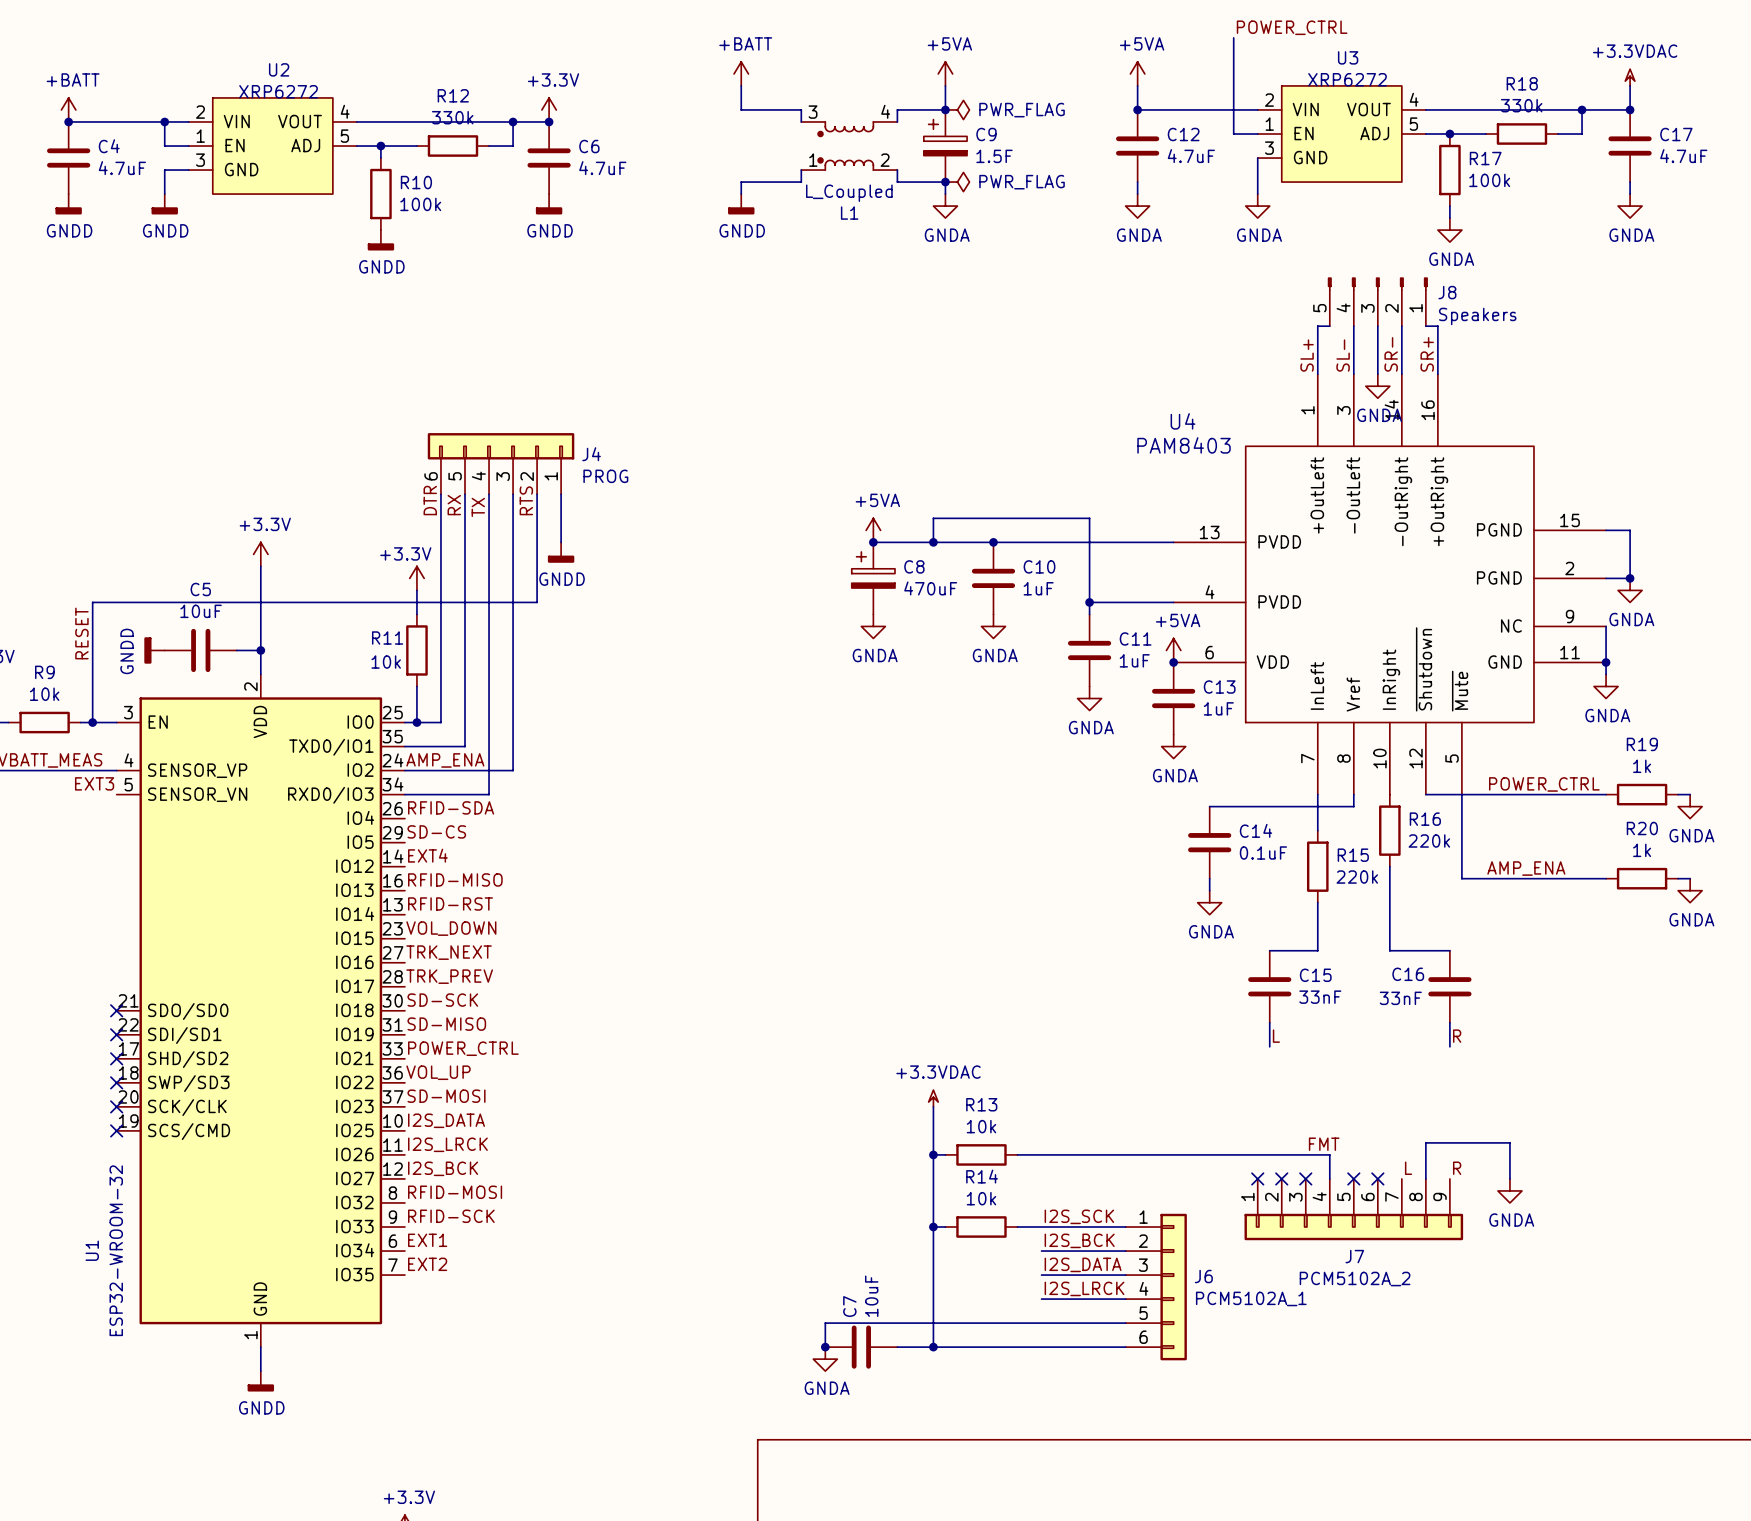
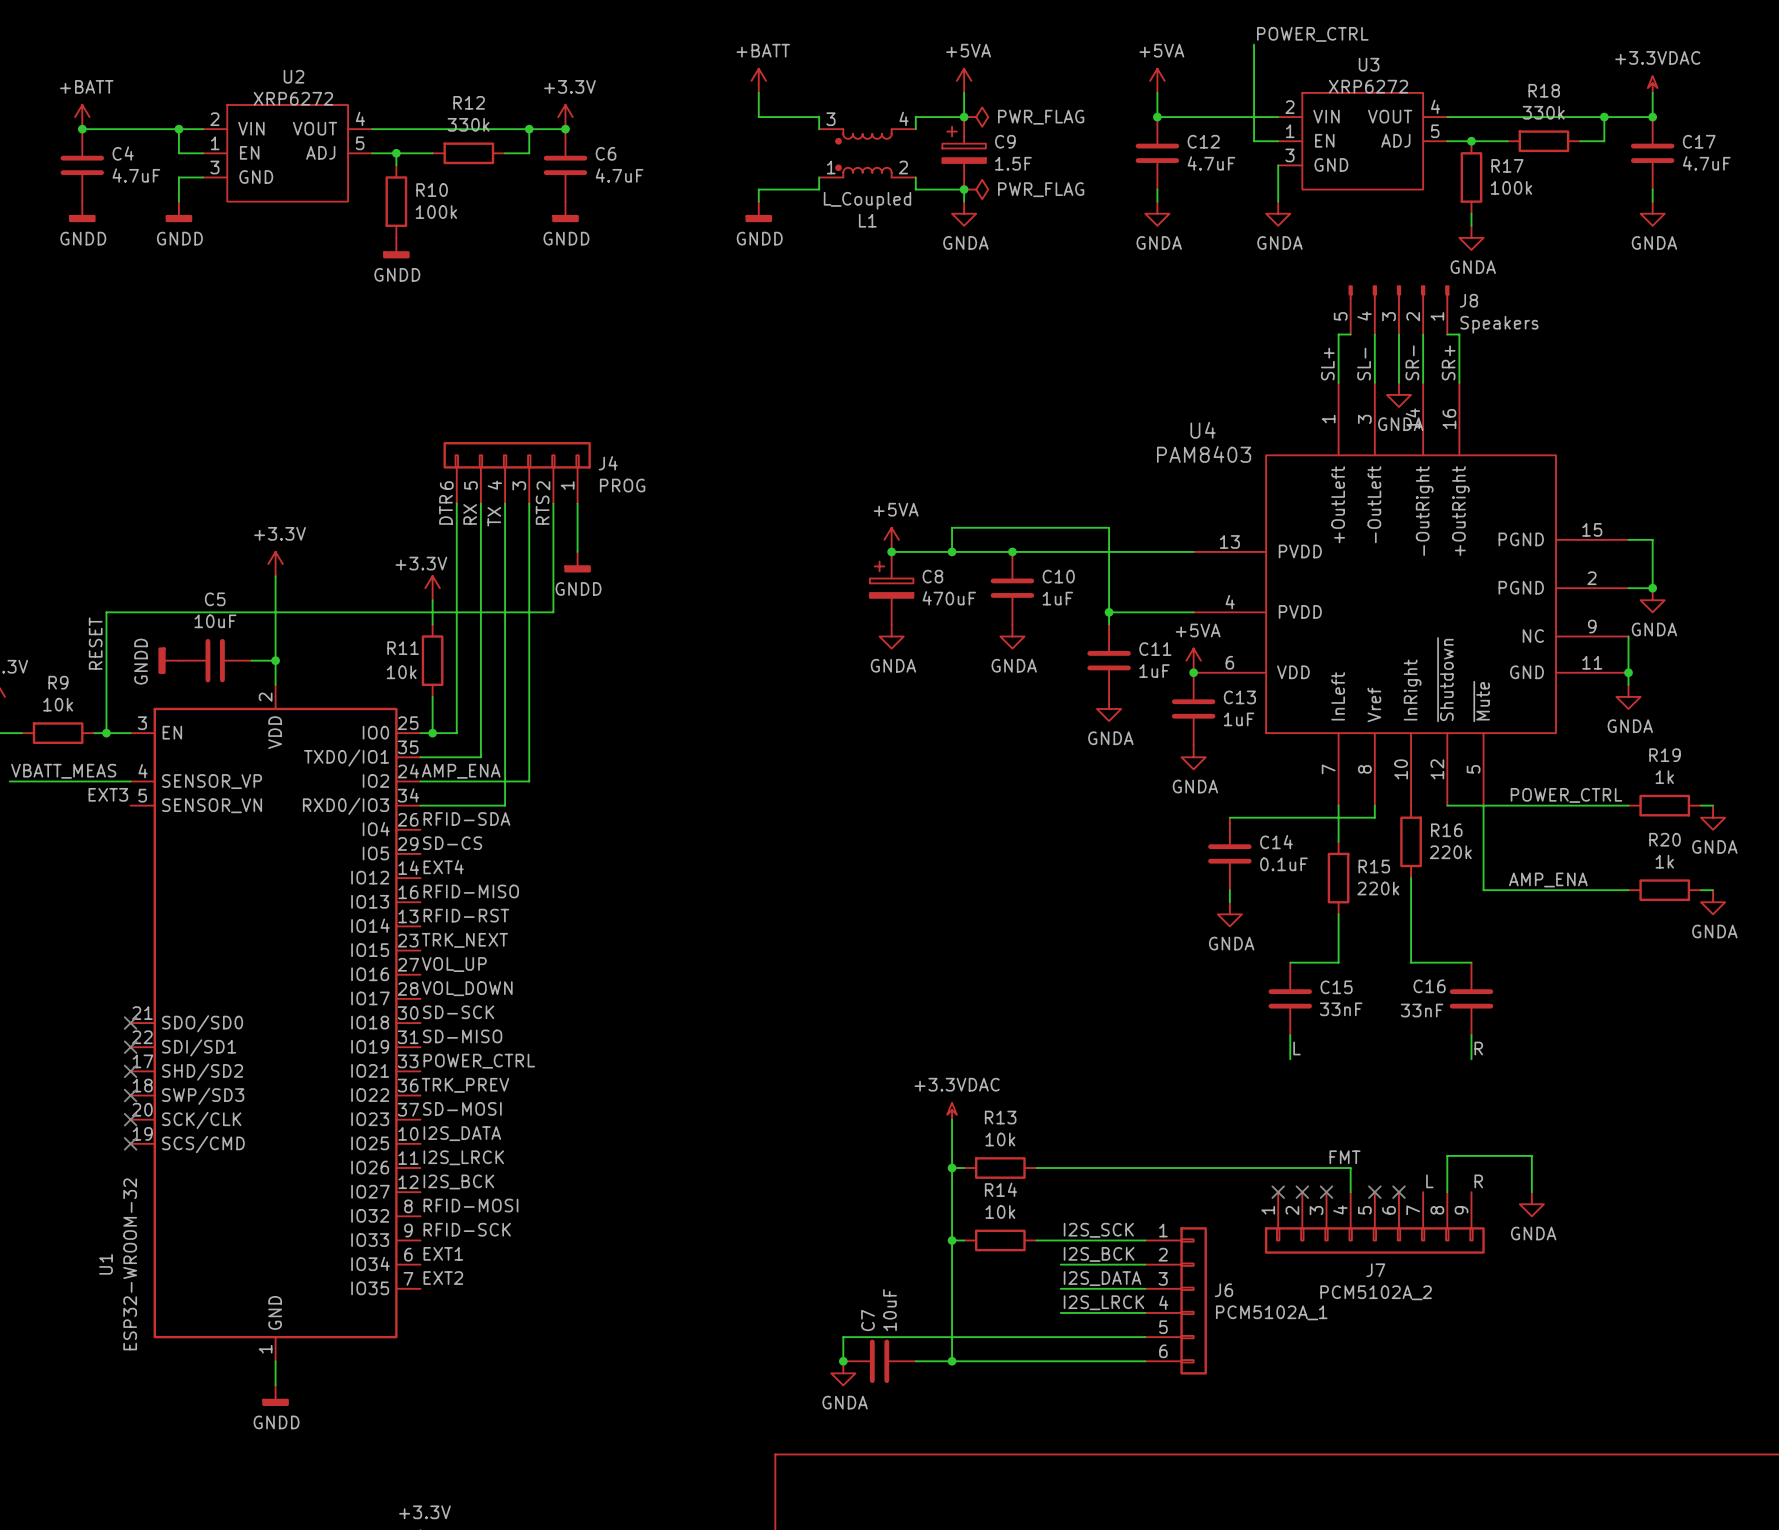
label: VOL_DOWN (451, 928) -> TRK_NEXT (464, 940)
label: TRK_NEXT (449, 952) -> VOL_UP (454, 964)
label: TRK_PREV (449, 976) -> VOL_DOWN (467, 988)
label: VOL_UP (438, 1072) -> TRK_PREV (465, 1085)

